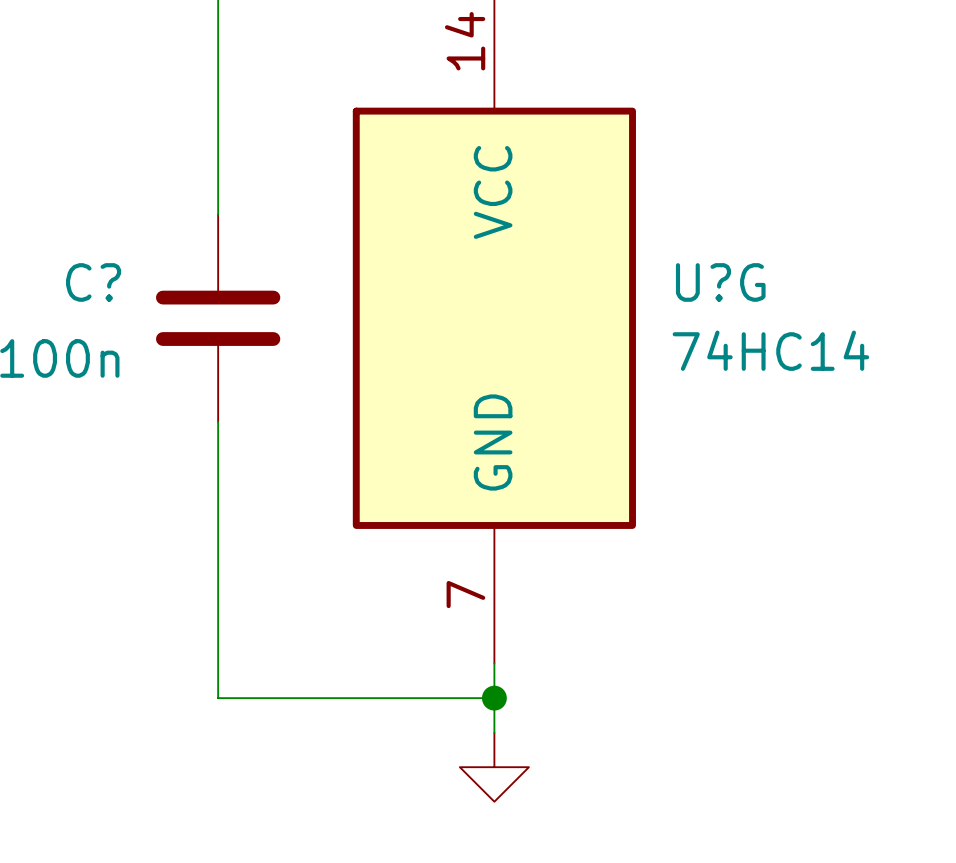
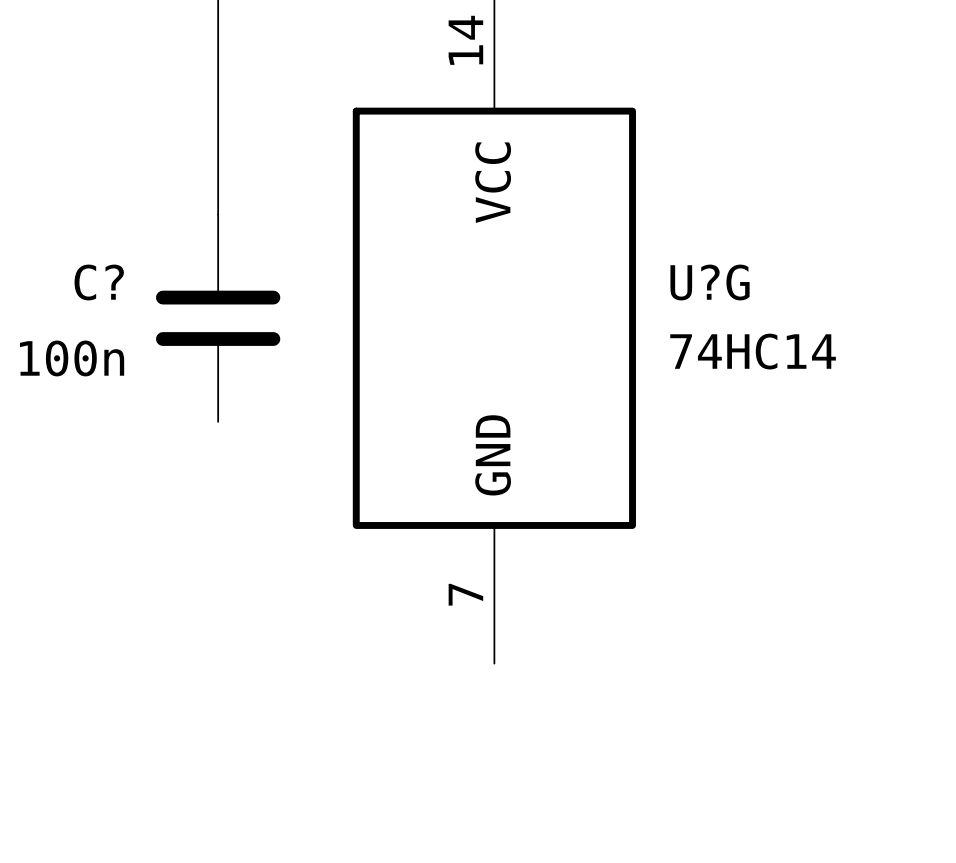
wire: (218, 421) (218, 698) (494, 698) -> none
wire: (494, 663) (494, 732) -> none
junction: (494, 698) -> none
power symbol: (494, 767) -> none

